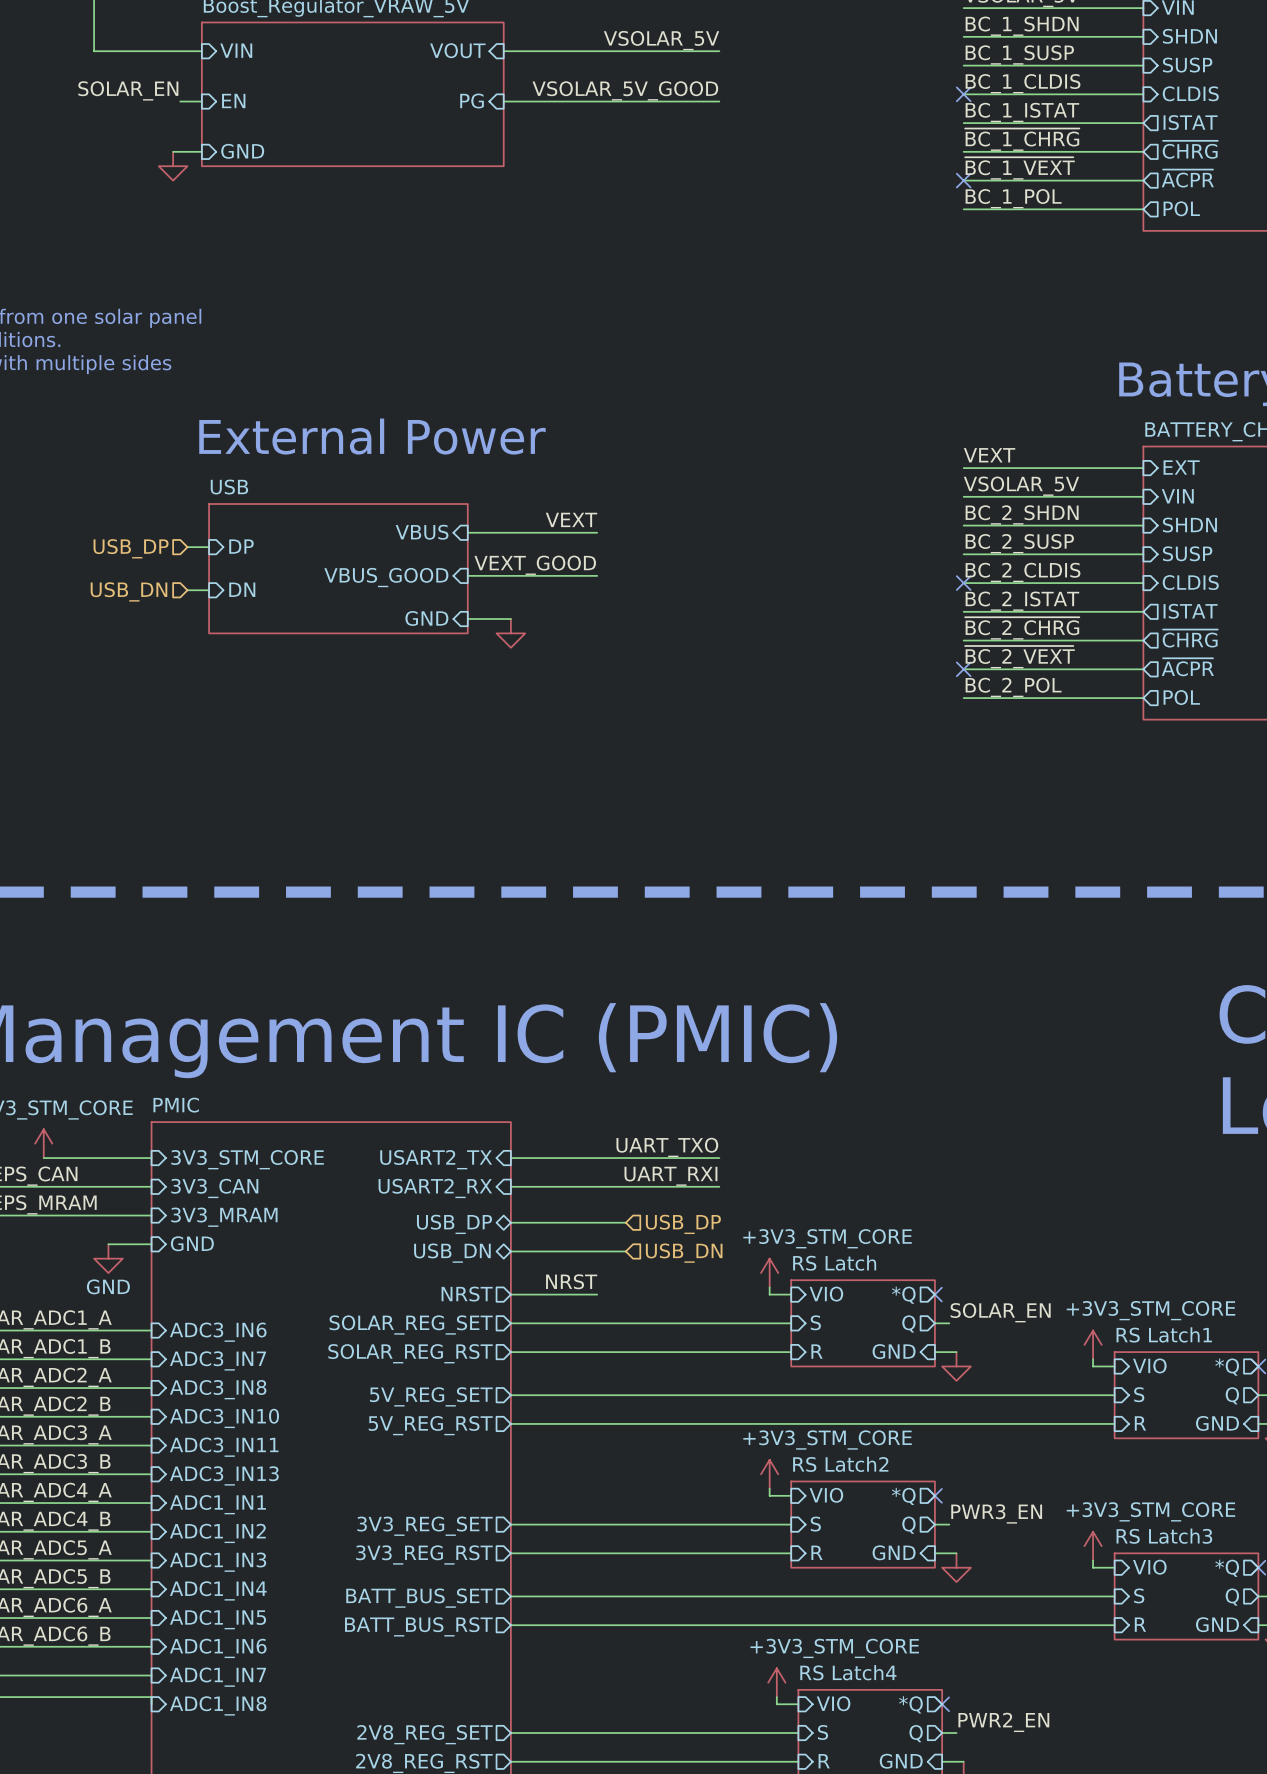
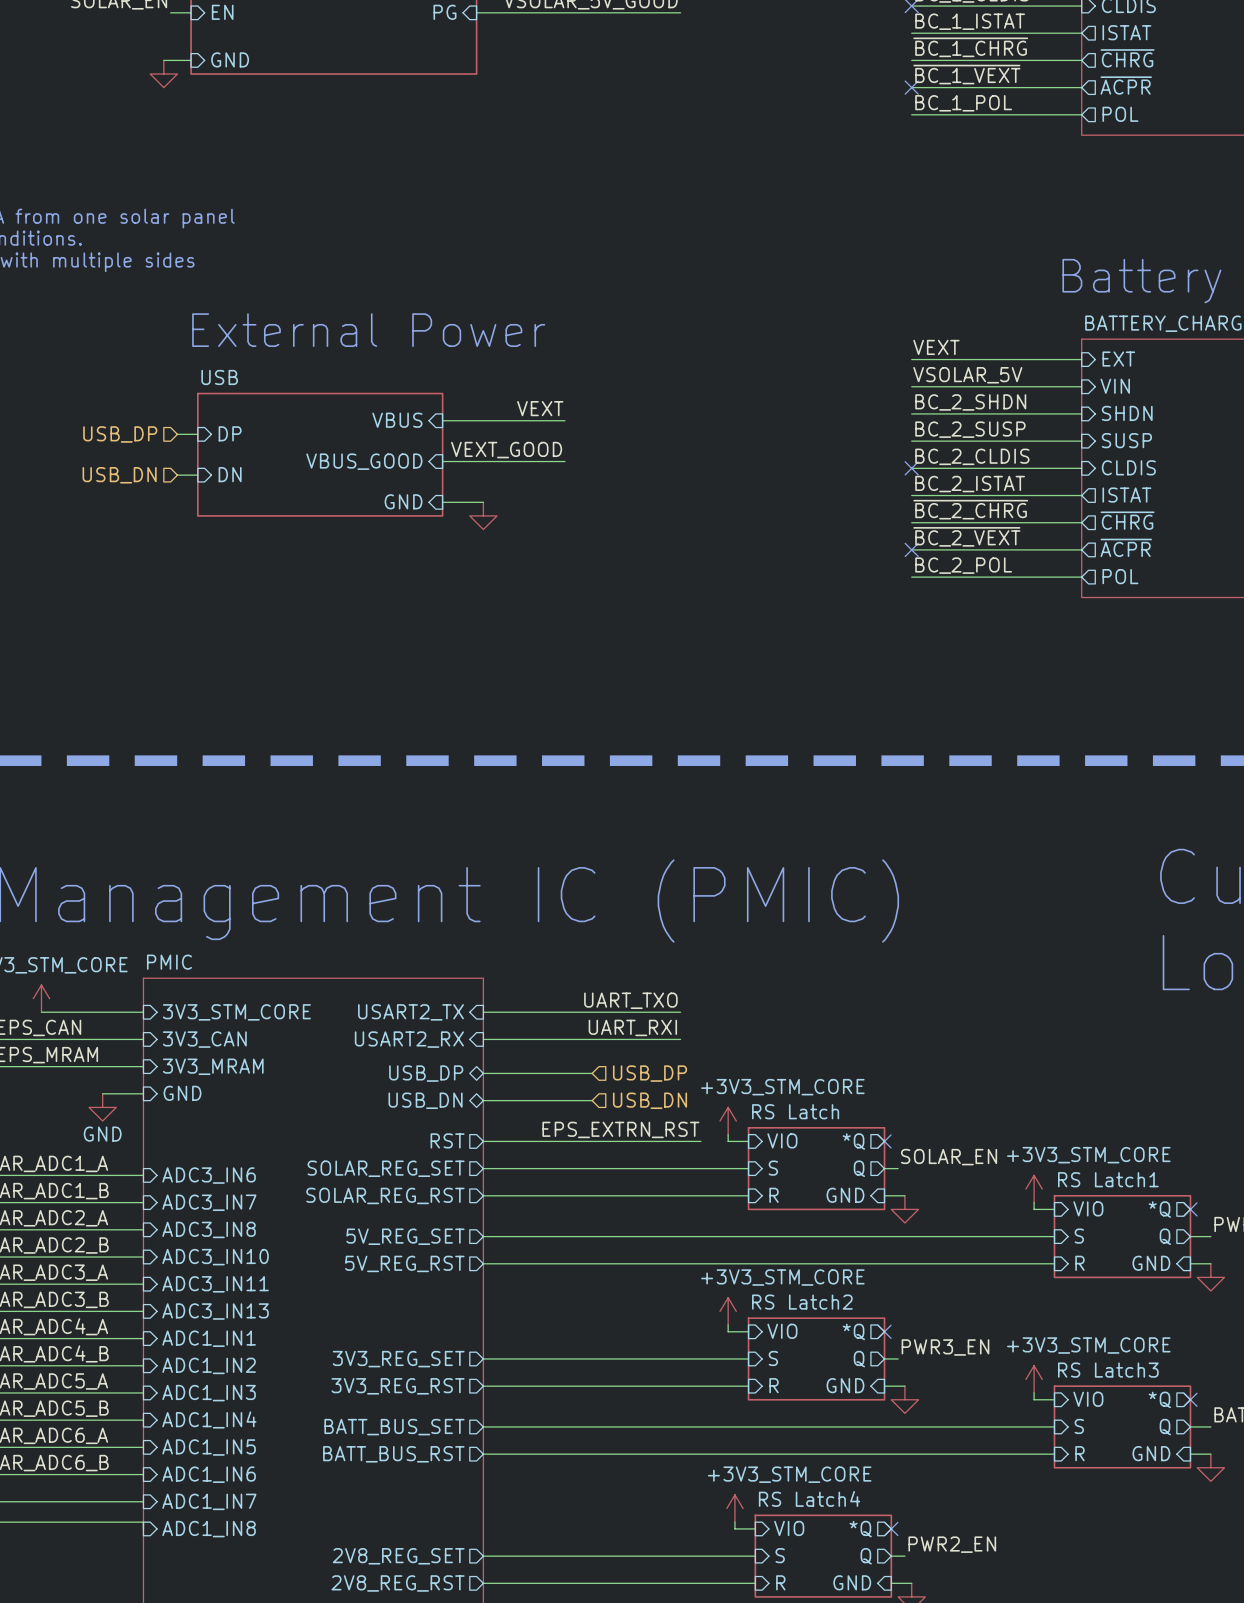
label: NRST (571, 1281) -> none
label: none -> EPS_EXTRN_RST (620, 1129)
sheet pin: NRST (467, 1294) -> RST (447, 1140)
wire: none -> (564, 1141) (700, 1141)

